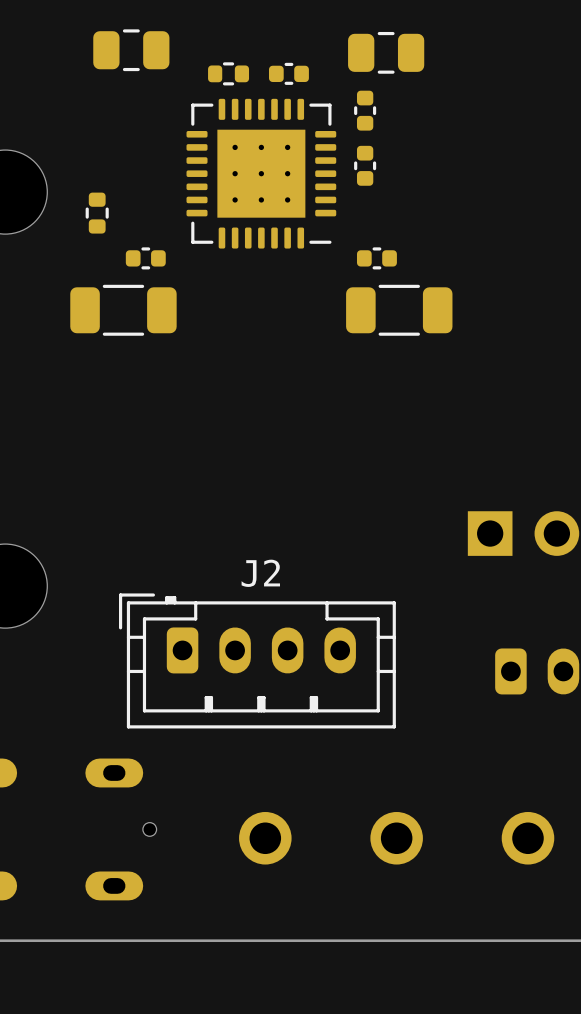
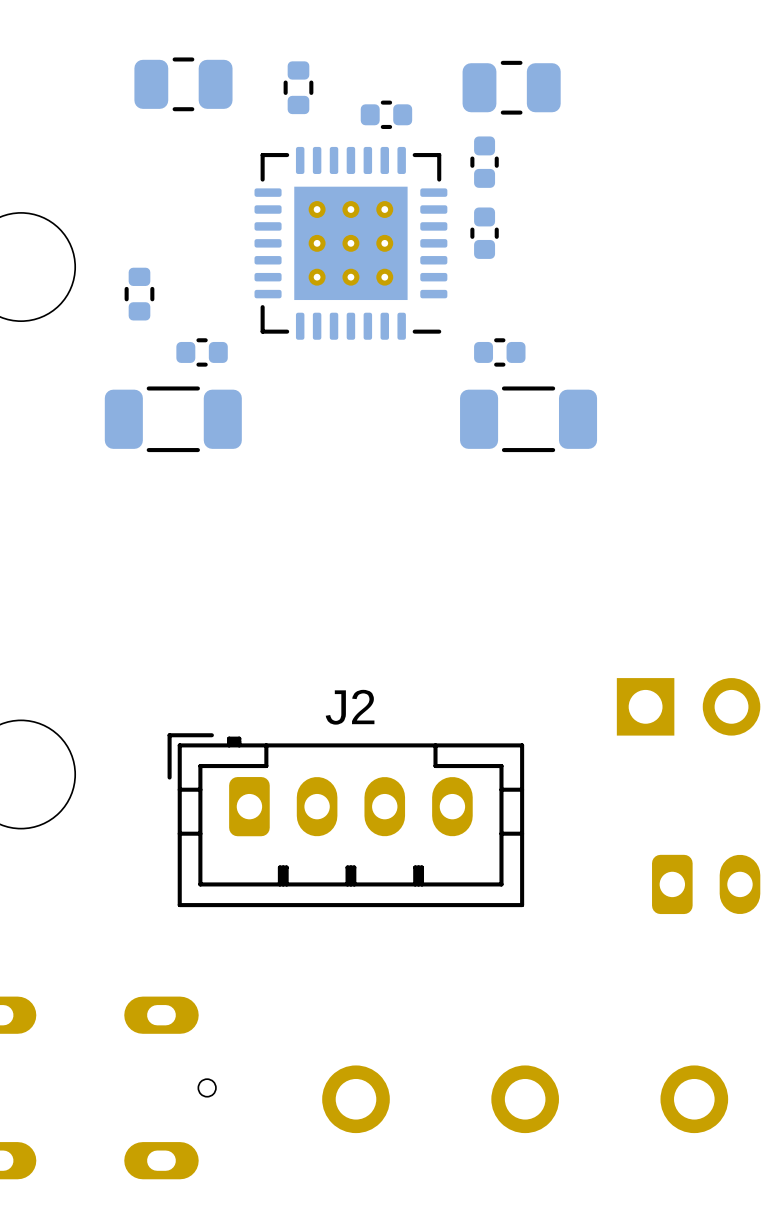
part rotation: 0° (228, 73) -> 90° clockwise (298, 87)
J2 position: (257, 660) -> (345, 820)

